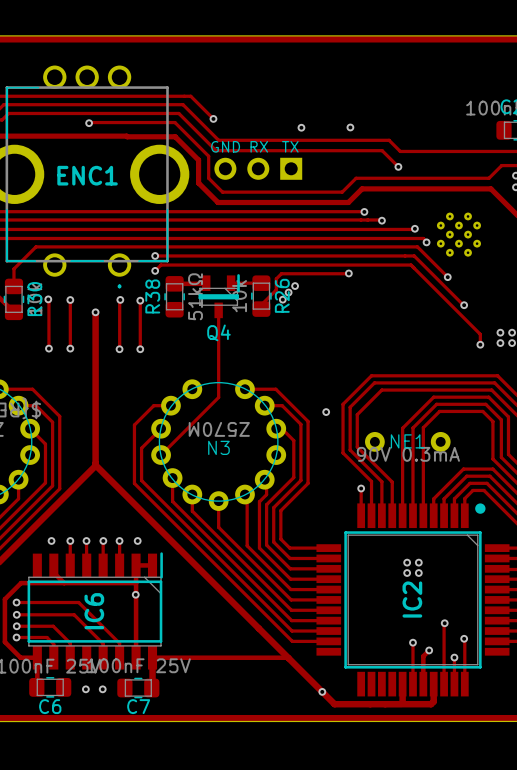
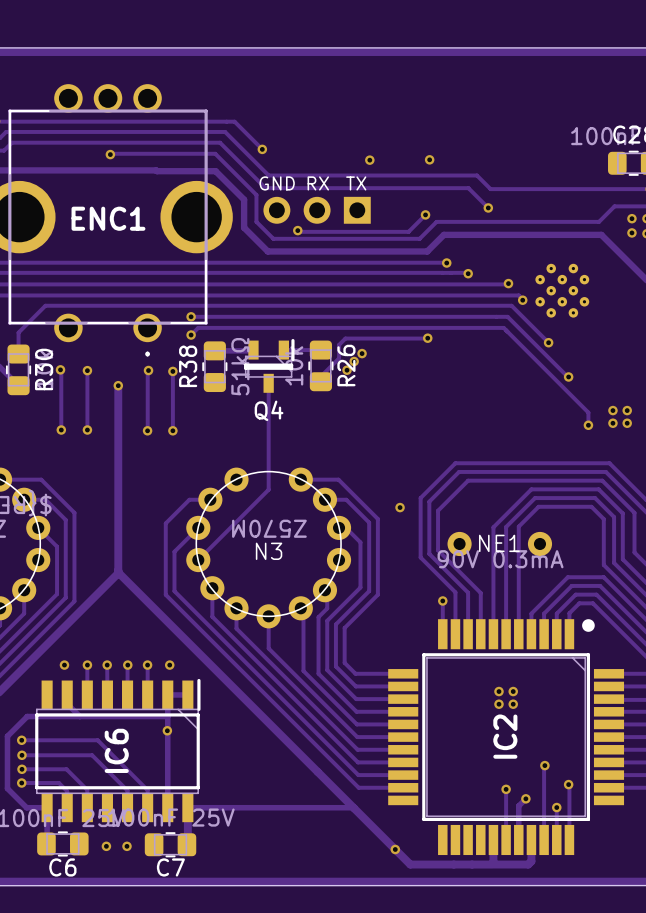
track: none -> (425, 214) (408, 231) (297, 231)
via: none -> (425, 214)
via: none -> (297, 230)

